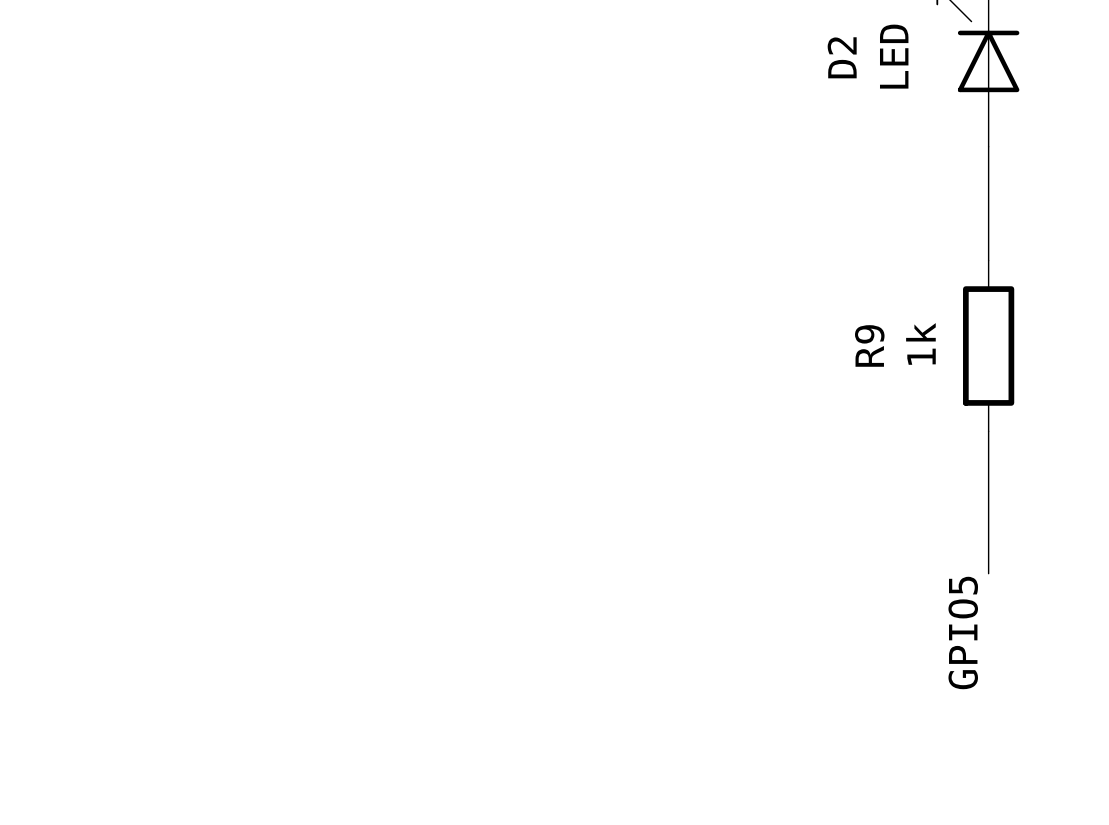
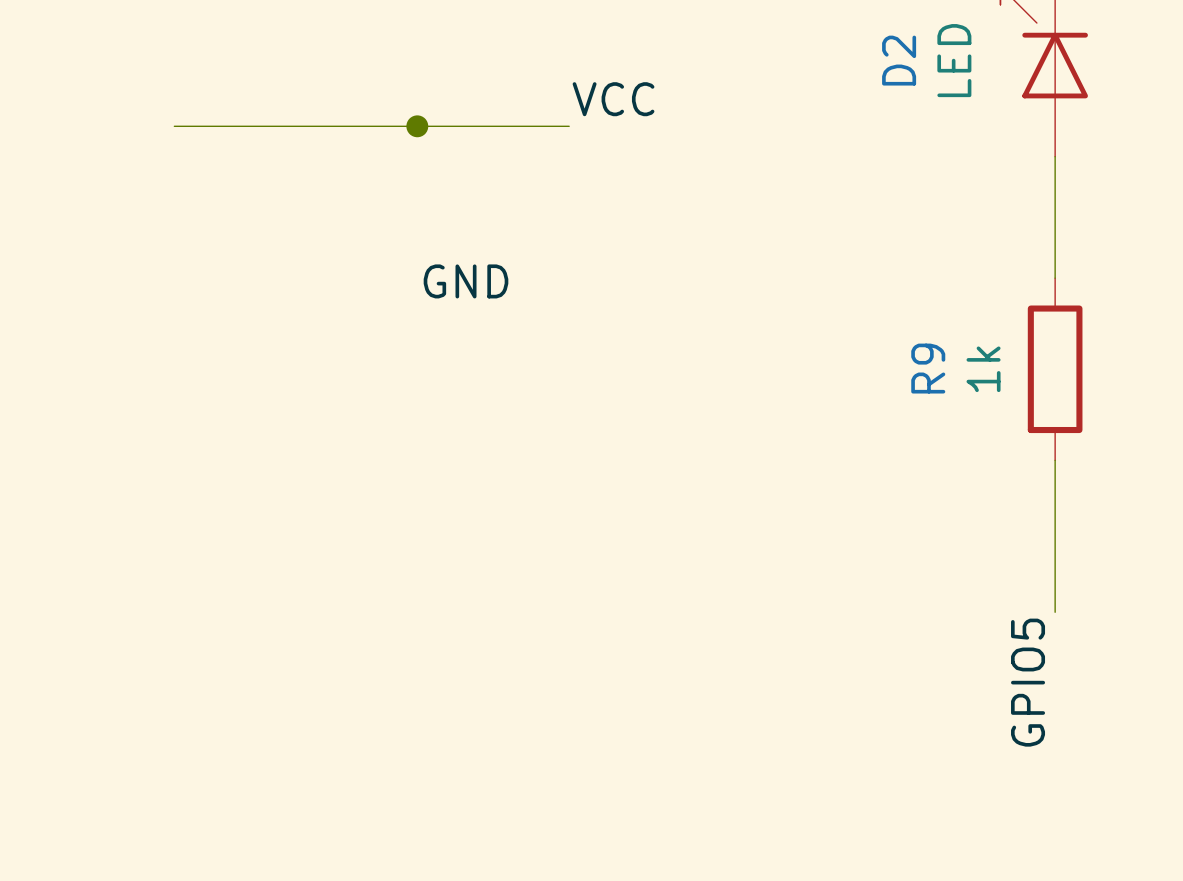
label: none -> VCC (613, 99)
wire: none -> (174, 126) (569, 126)
junction: none -> (417, 126)
label: none -> GND (466, 281)

